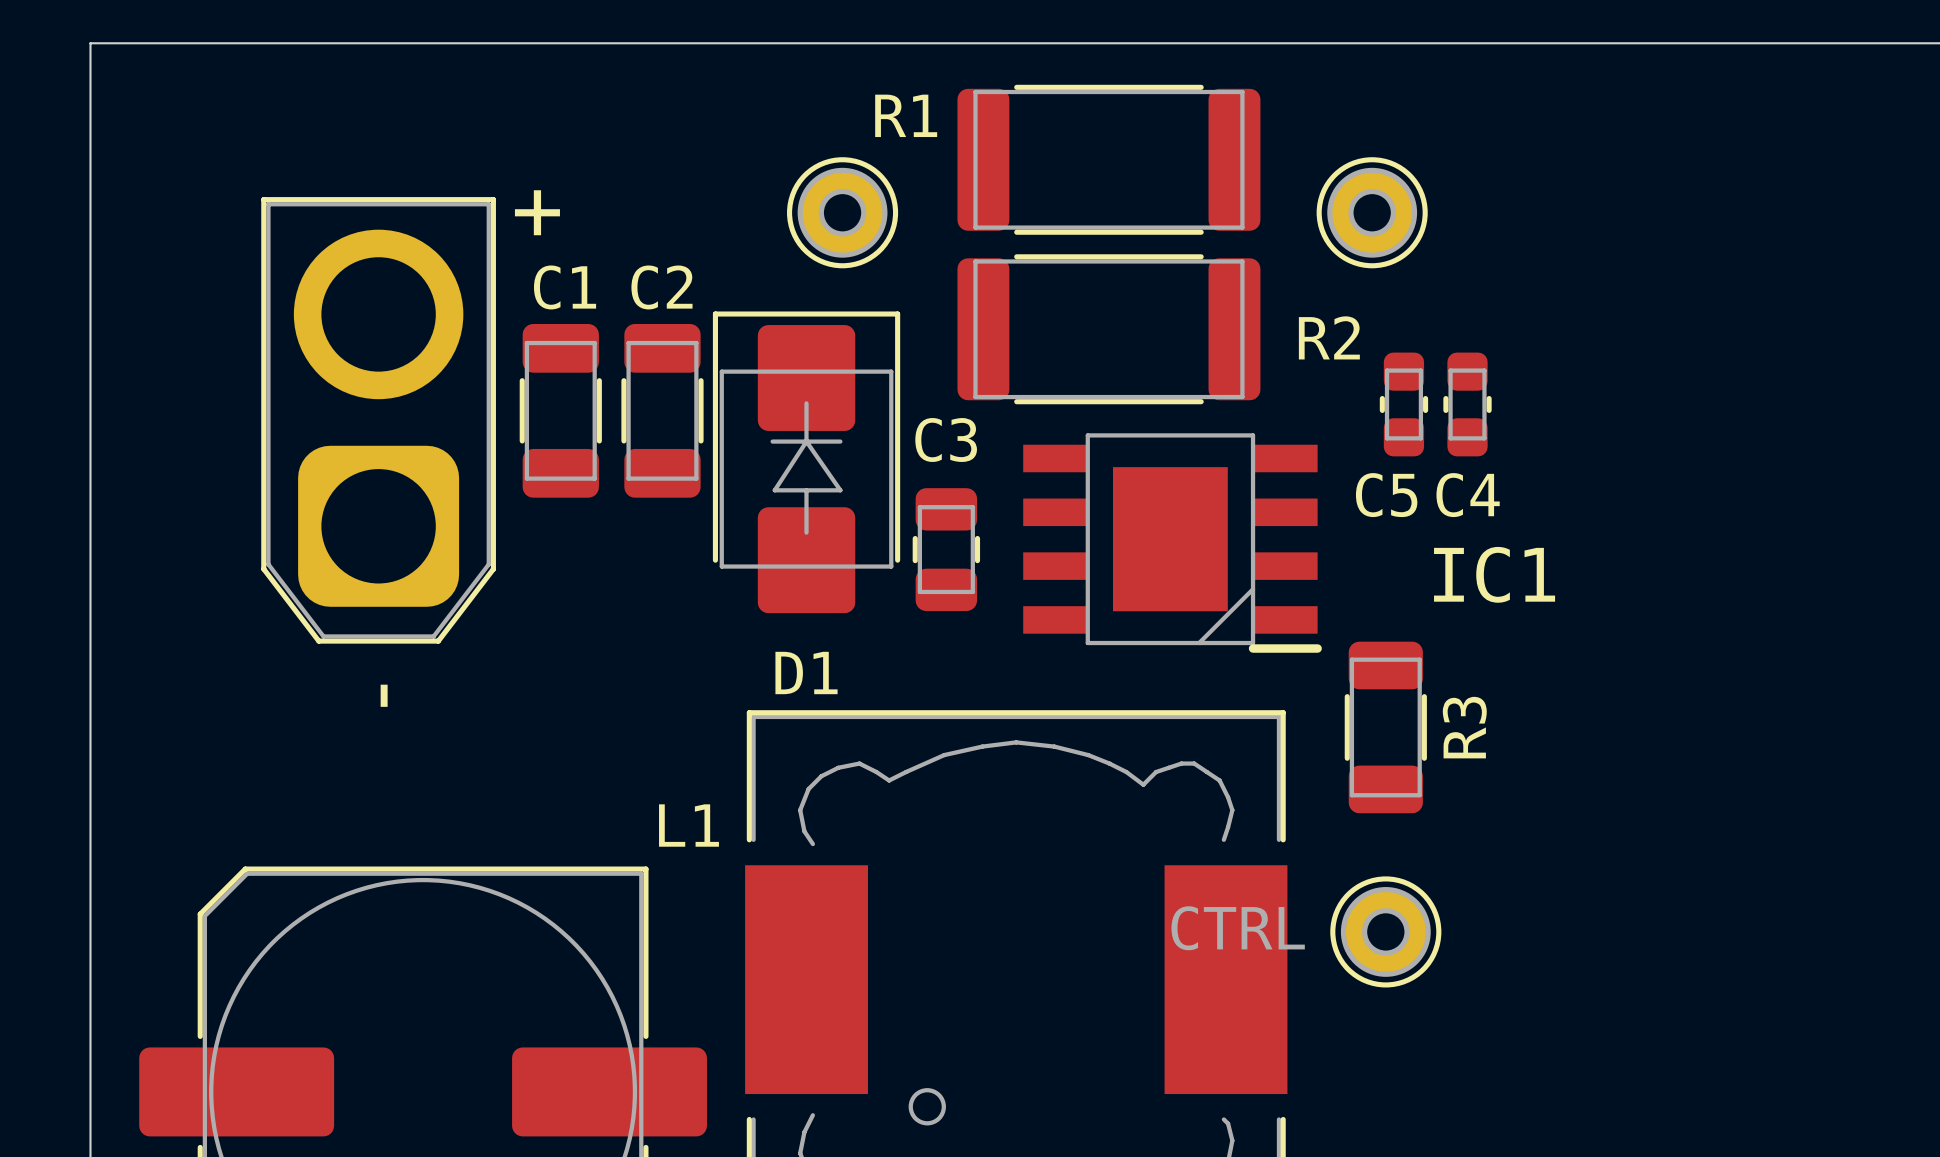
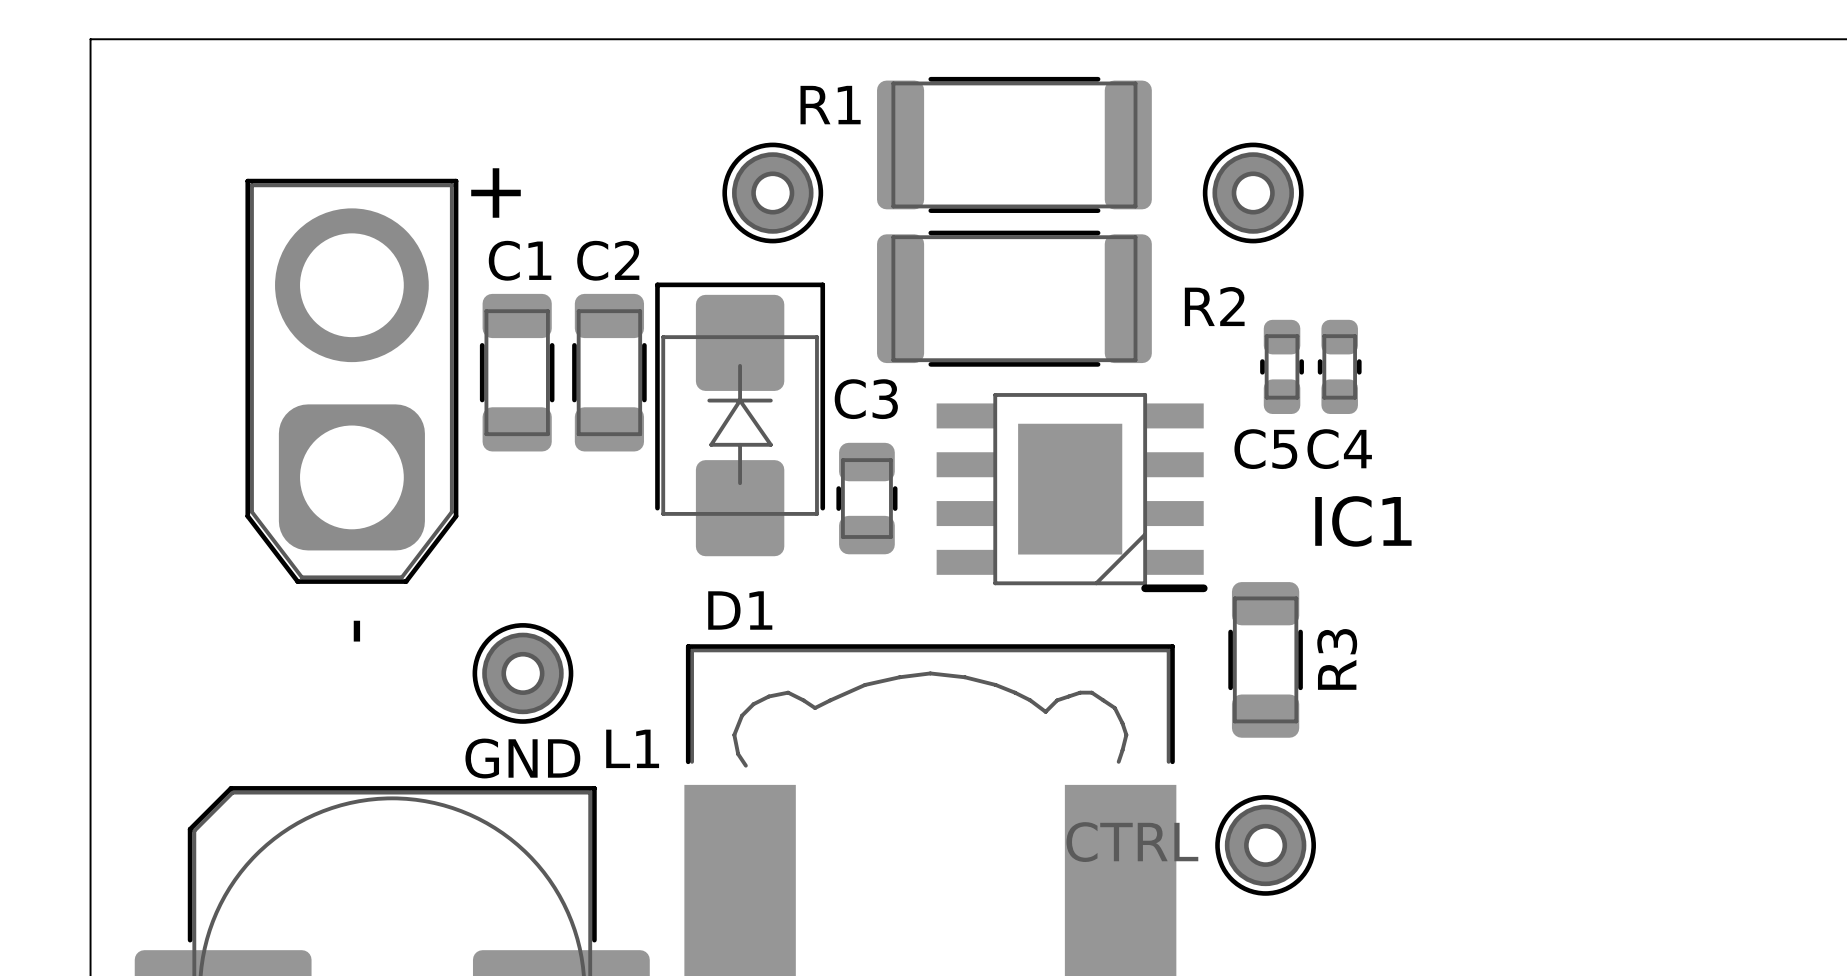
GND: none -> (522, 673)

